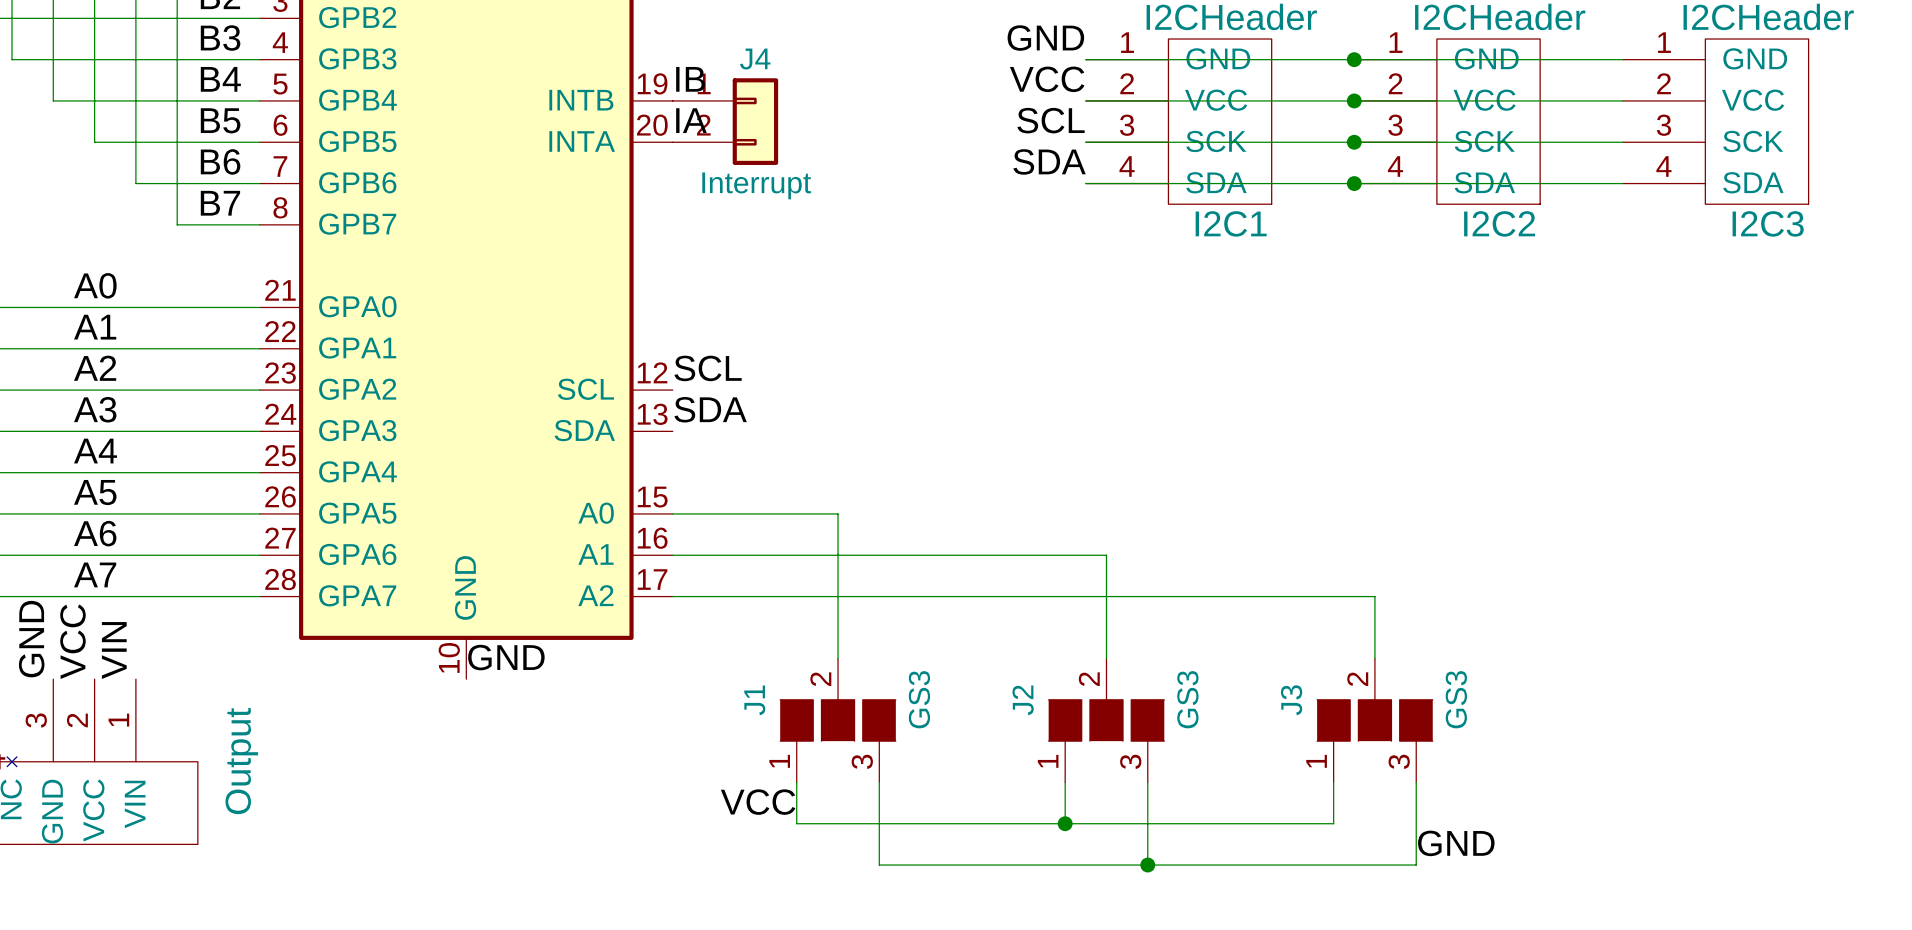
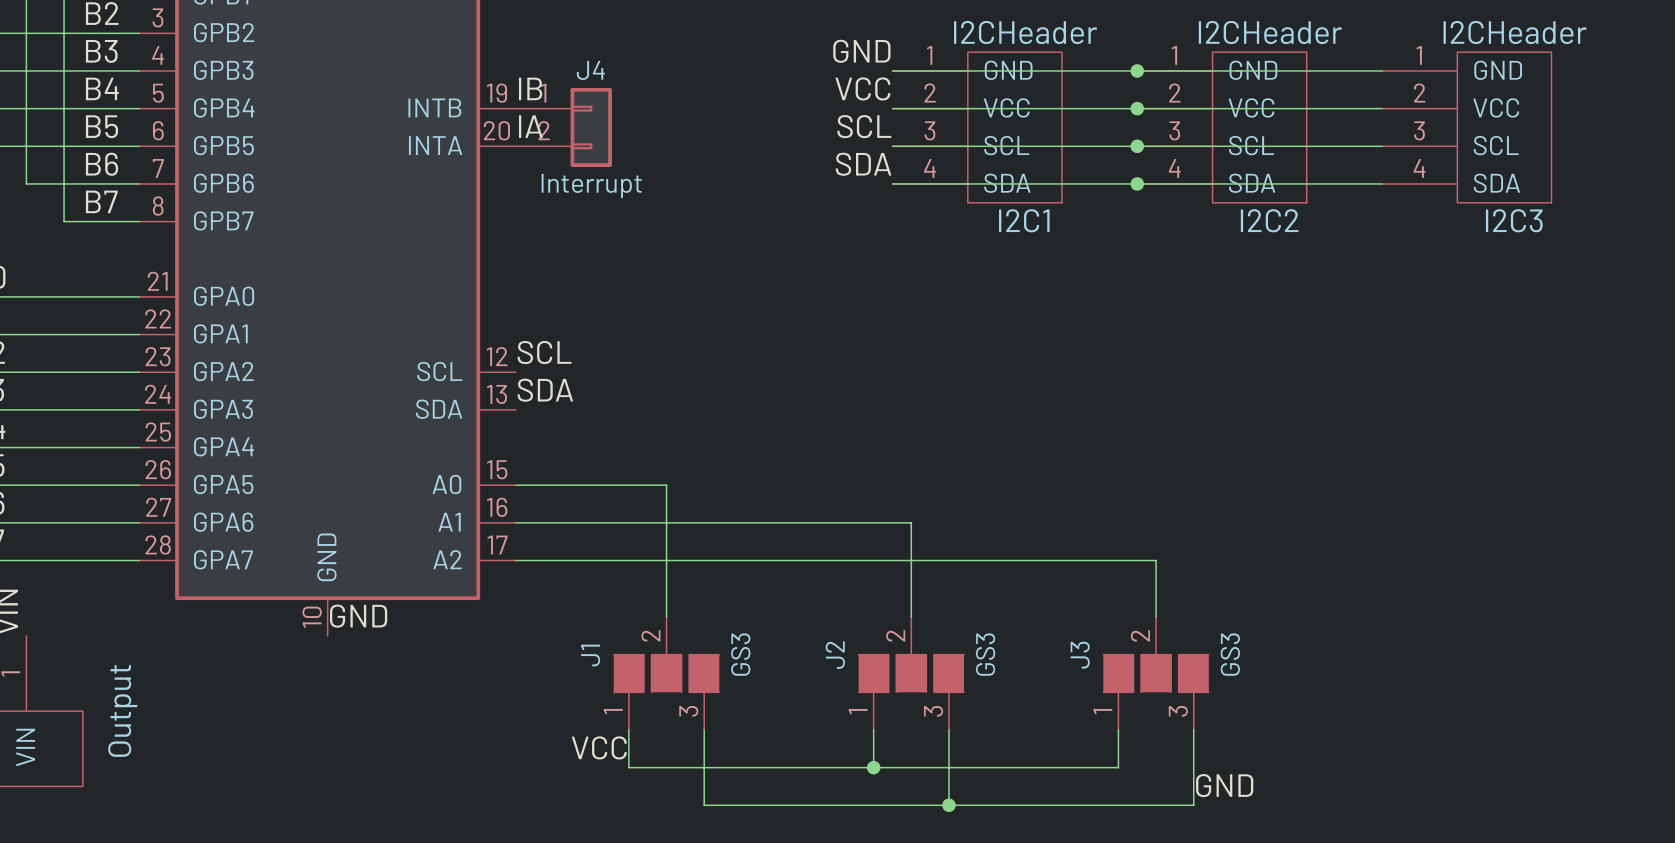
I2C1 pin name: SCK (1216, 141) -> SCL (1006, 145)
I2C2 pin name: SCK (1484, 141) -> SCL (1251, 145)
I2C3 pin name: SCK (1753, 141) -> SCL (1496, 145)

